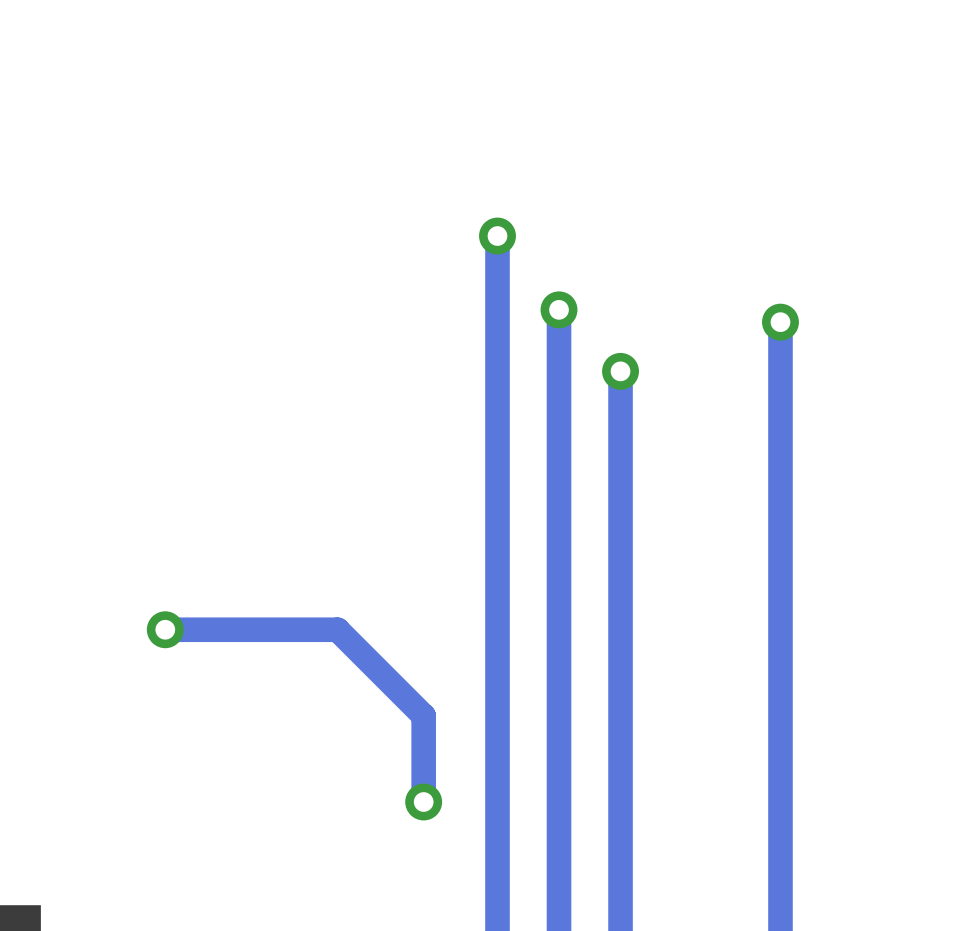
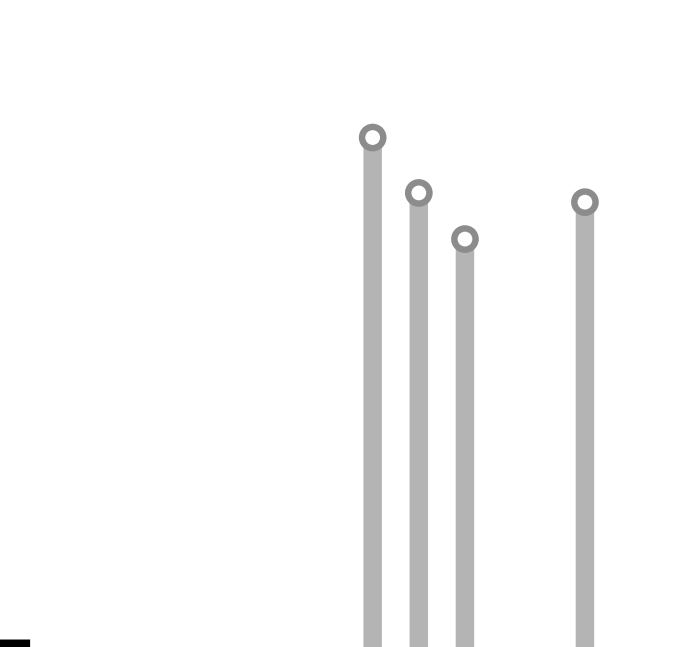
track: (165, 629) (337, 629) (423, 715) (423, 802) -> none
via: (165, 629) -> none
via: (423, 802) -> none

